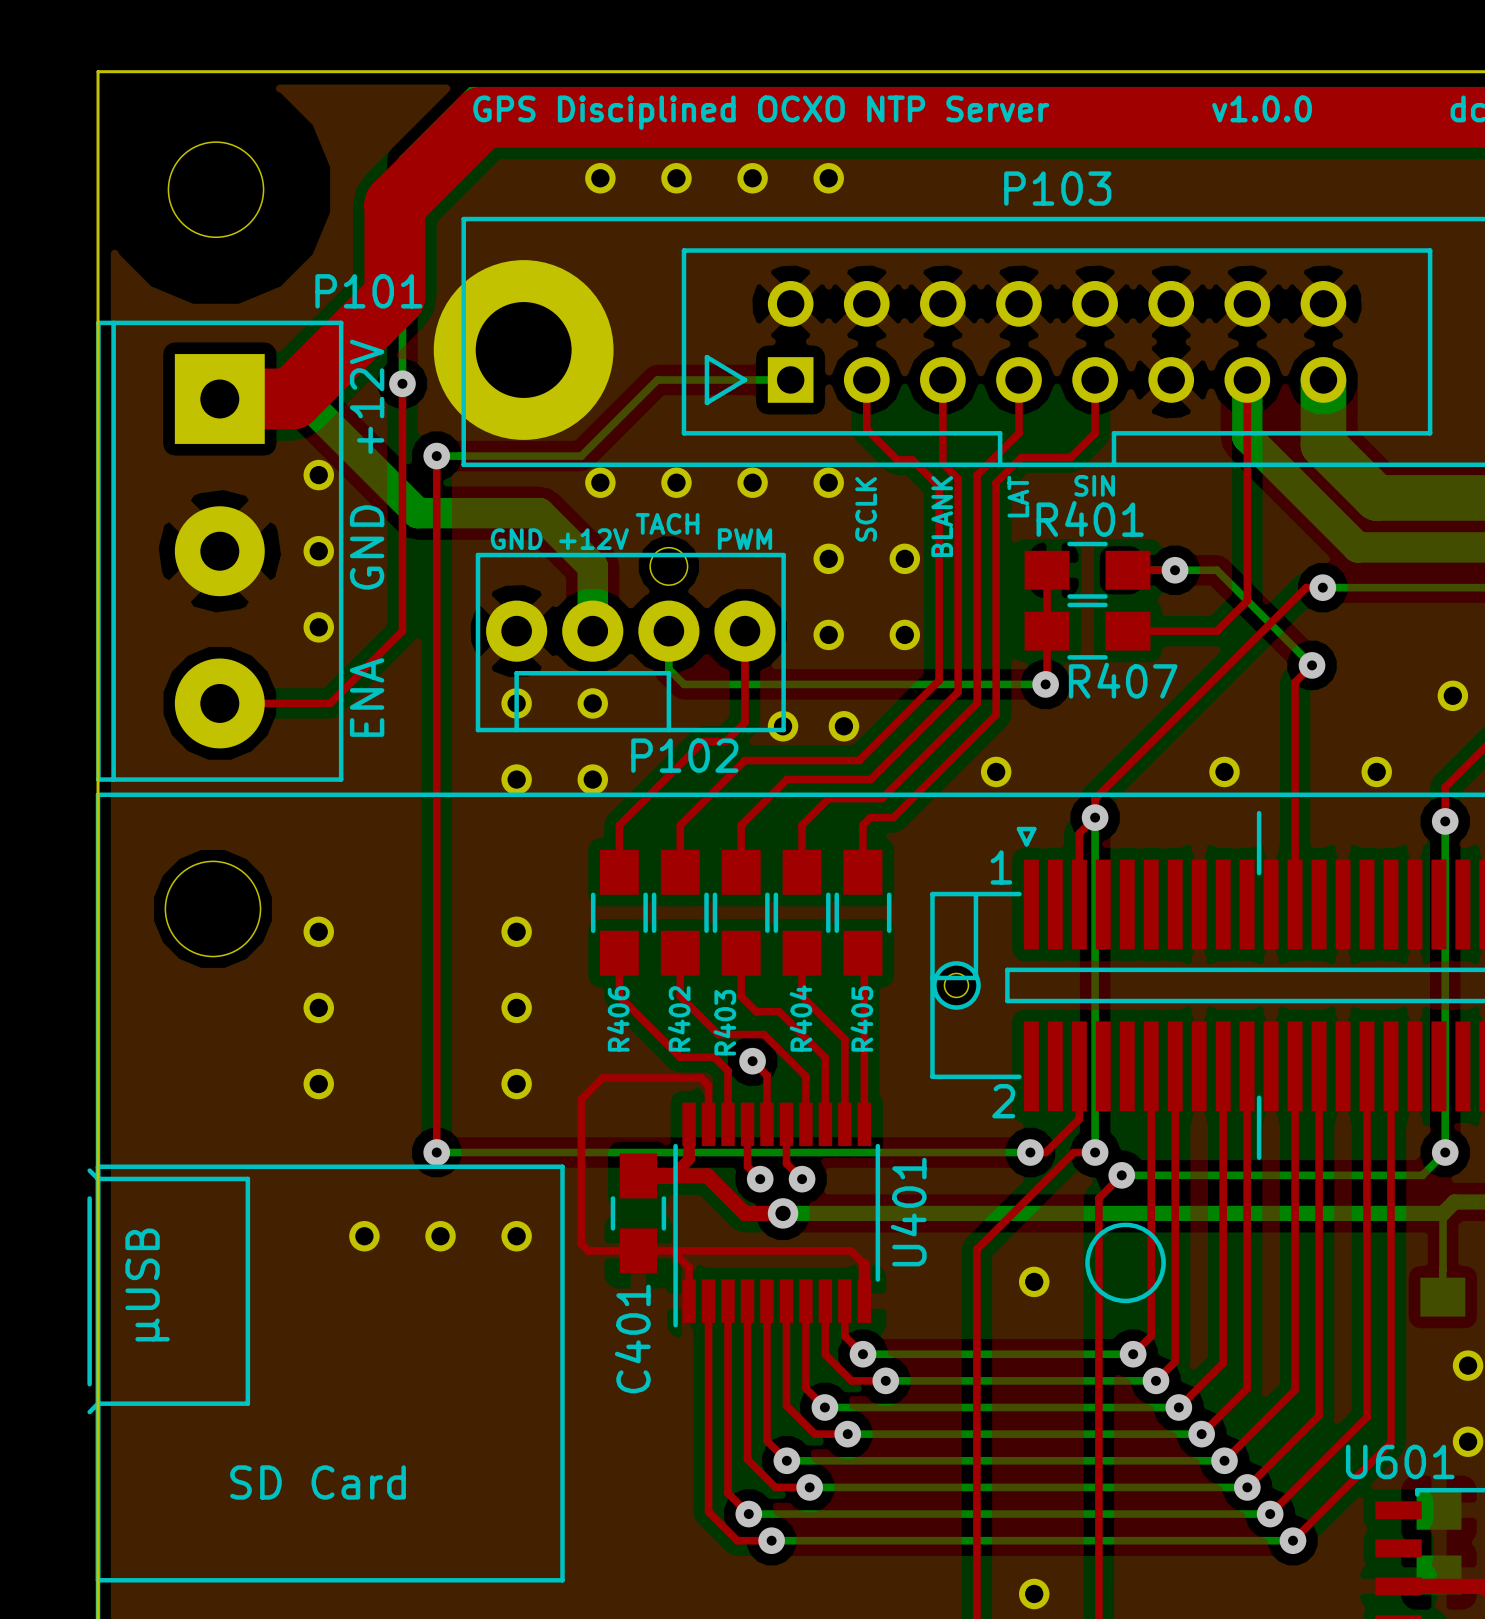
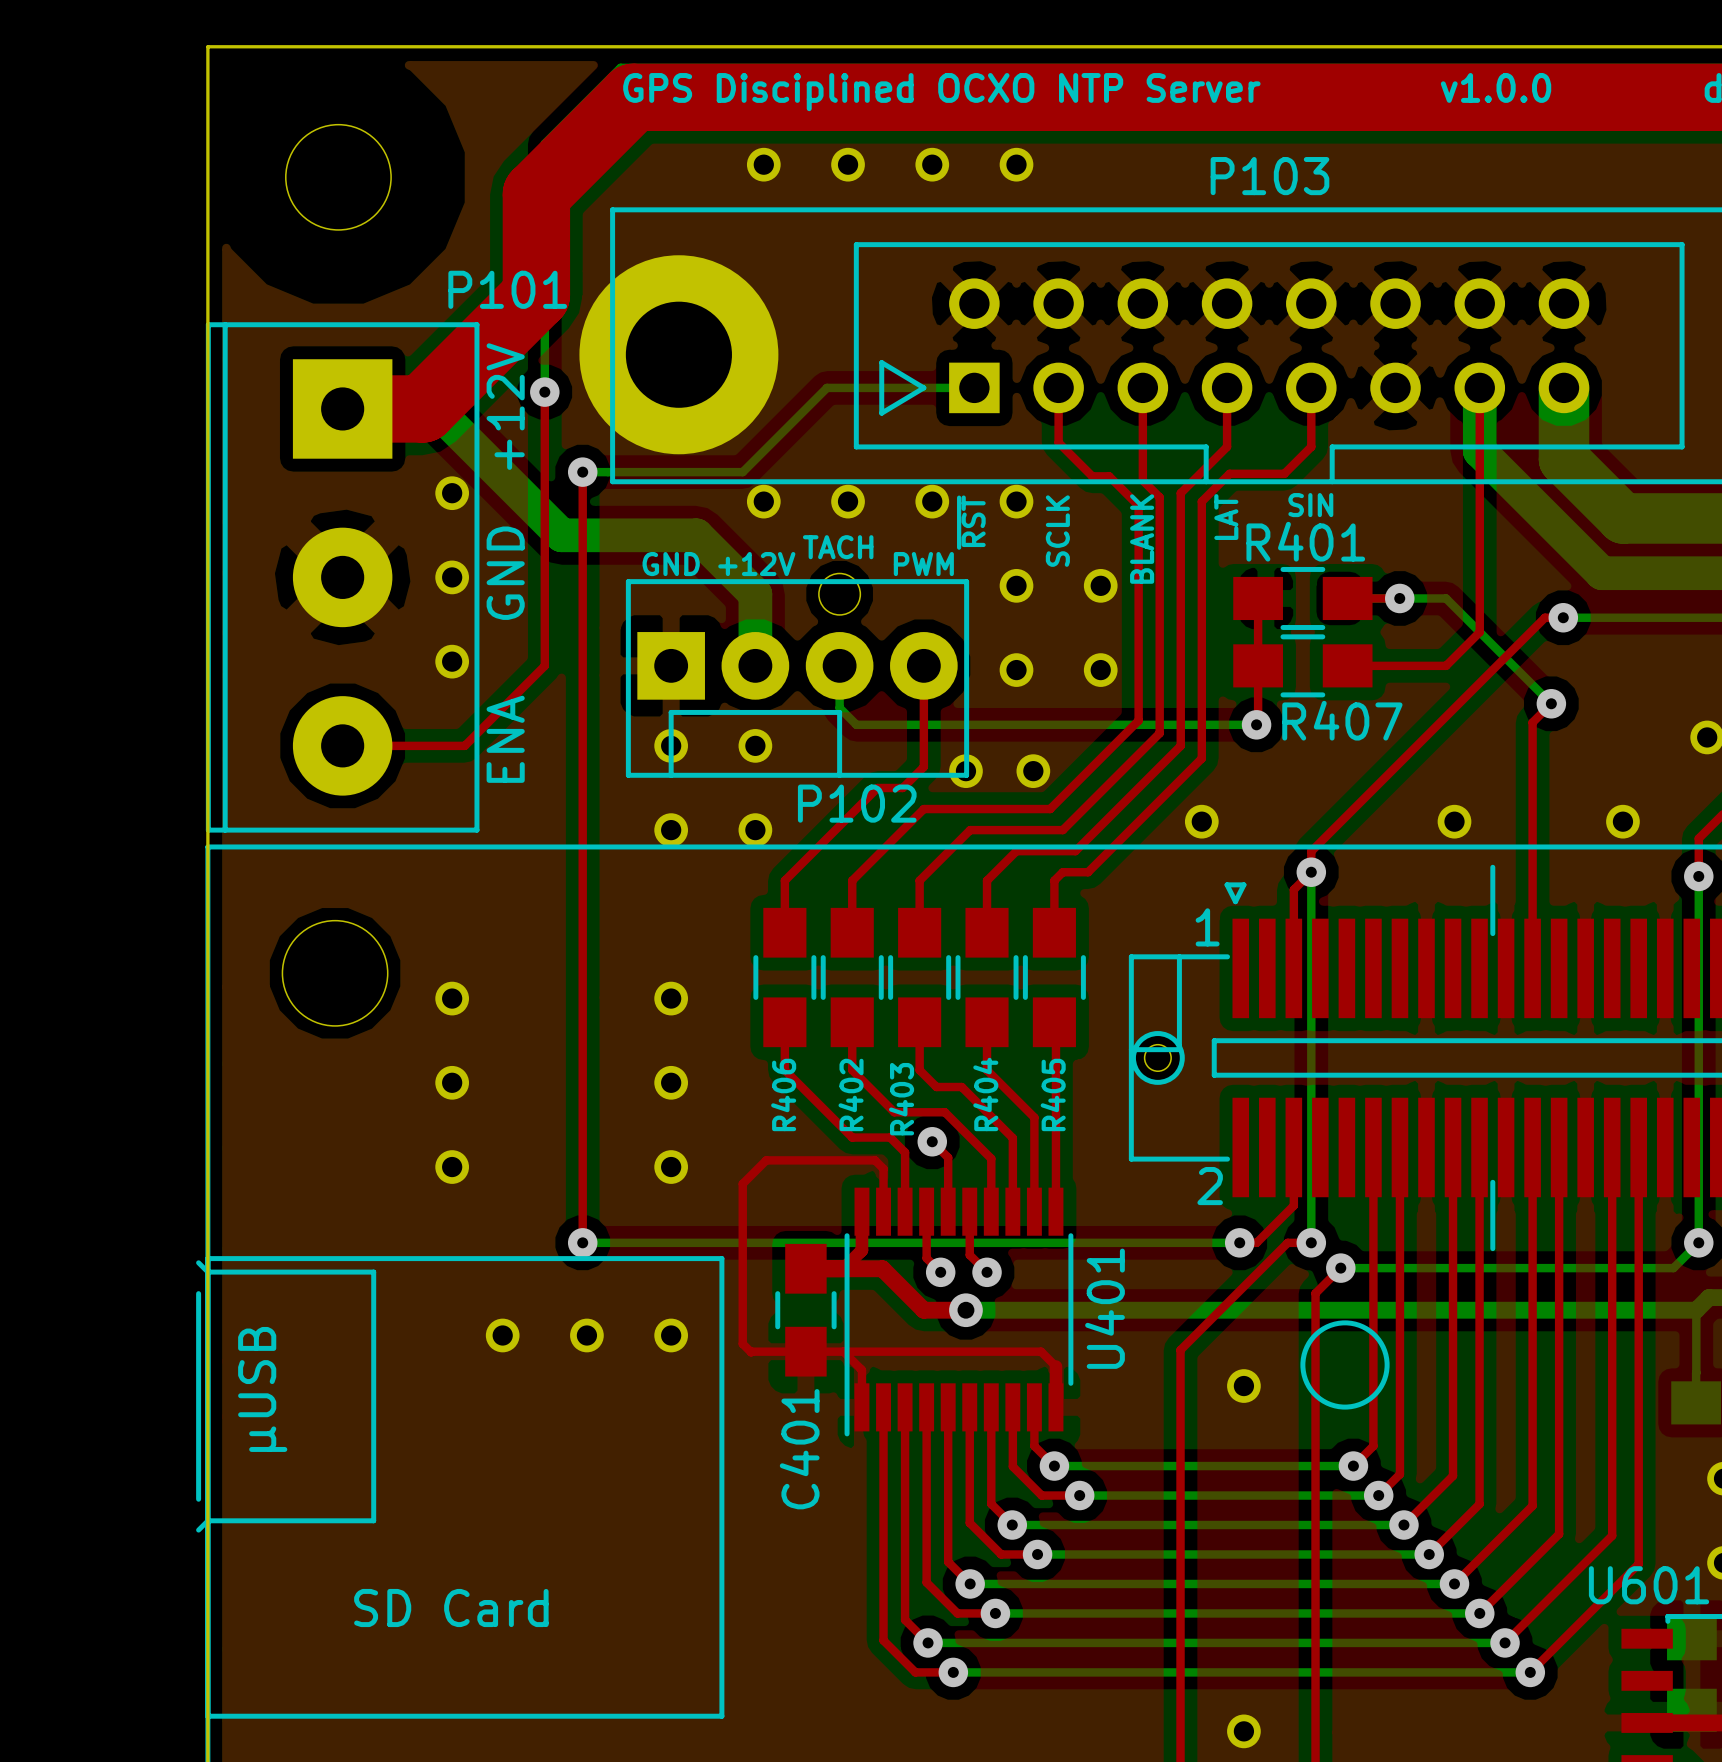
text: none -> ~{RST} (971, 522)
P102 footprint: [475, 547, 786, 733] -> [625, 573, 970, 778]

